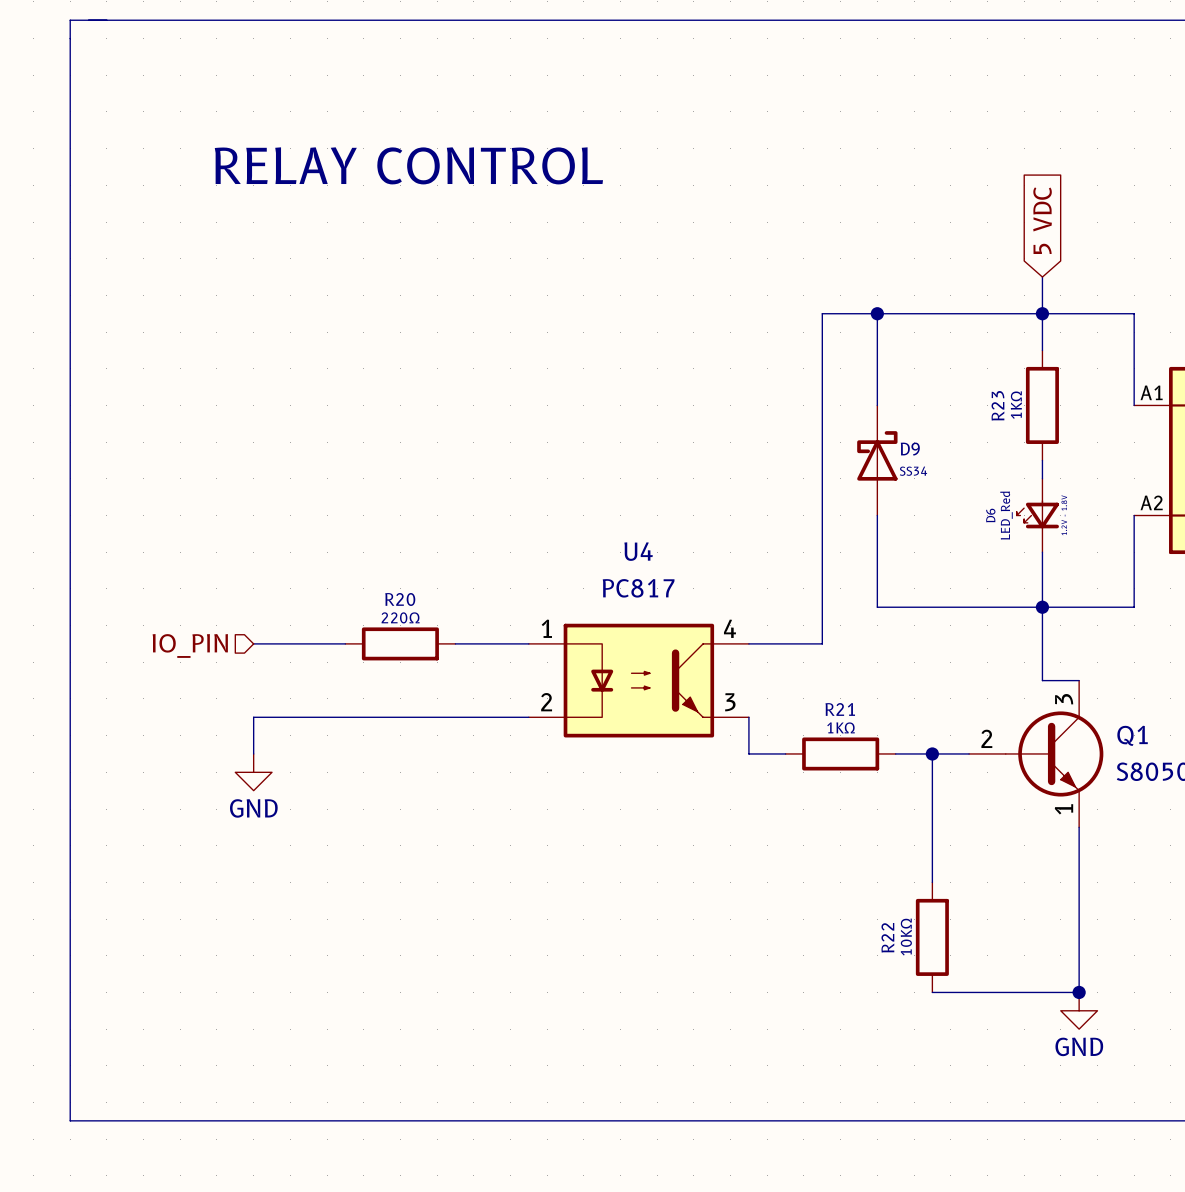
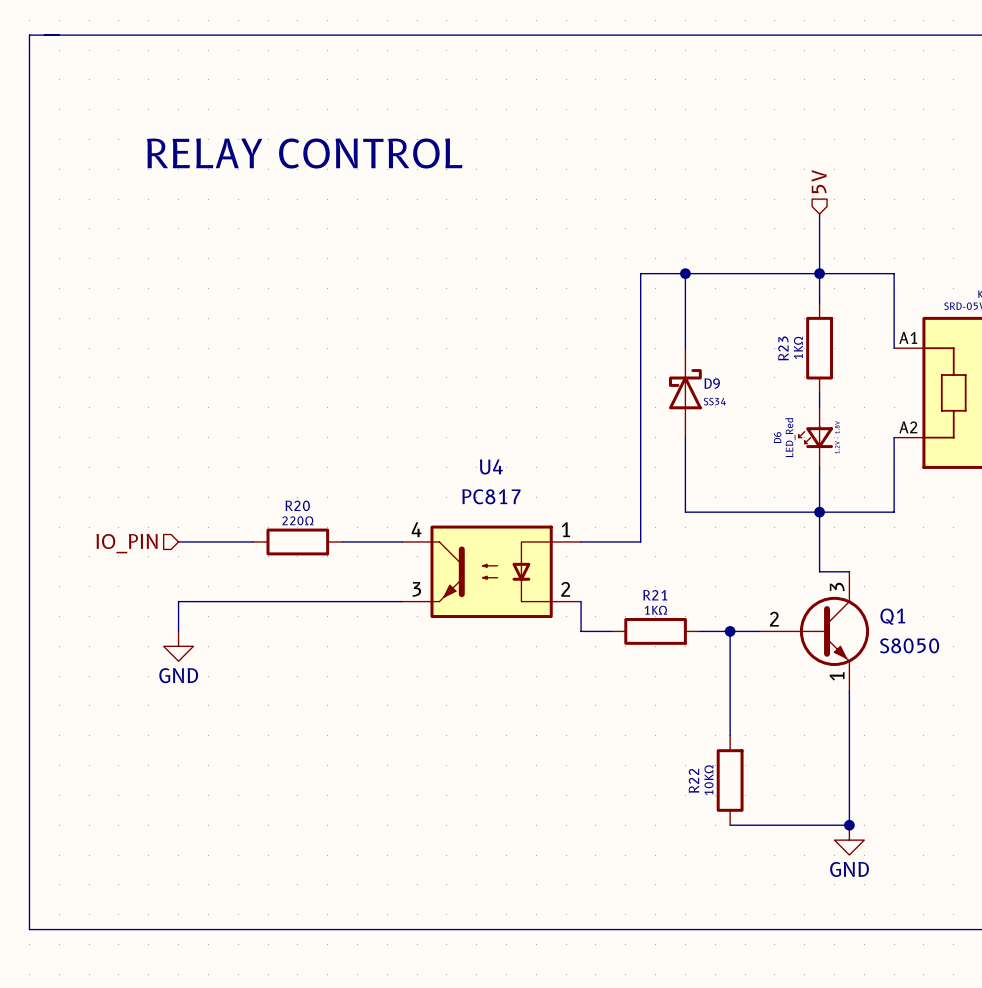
hierarchical label: none -> 5V (819, 181)
global label: 5 VDC (1042, 220) -> none
wire: none -> (819, 214) (819, 243)
U4 flip: as is (638, 680) -> left-right (491, 571)

